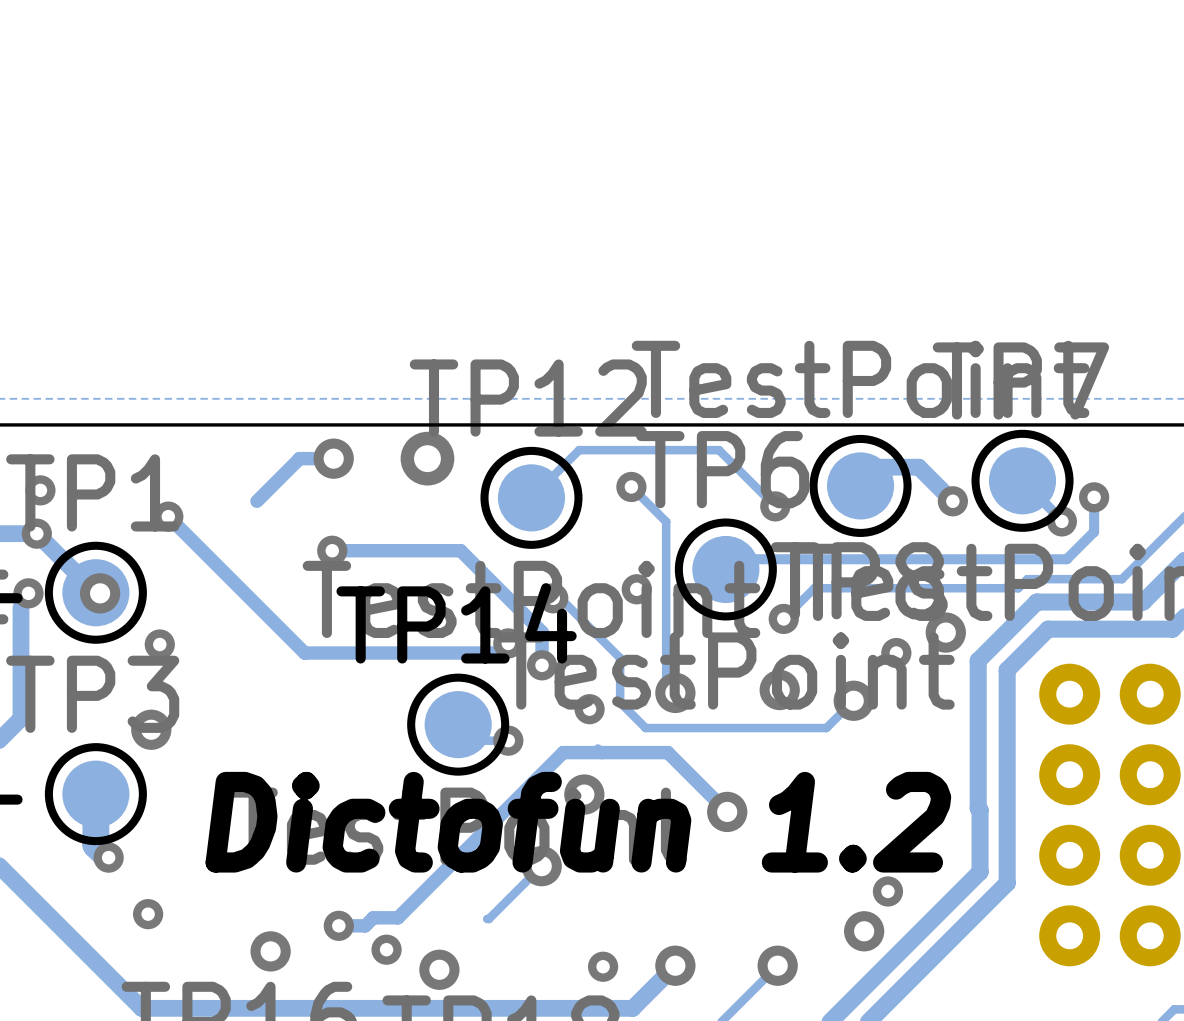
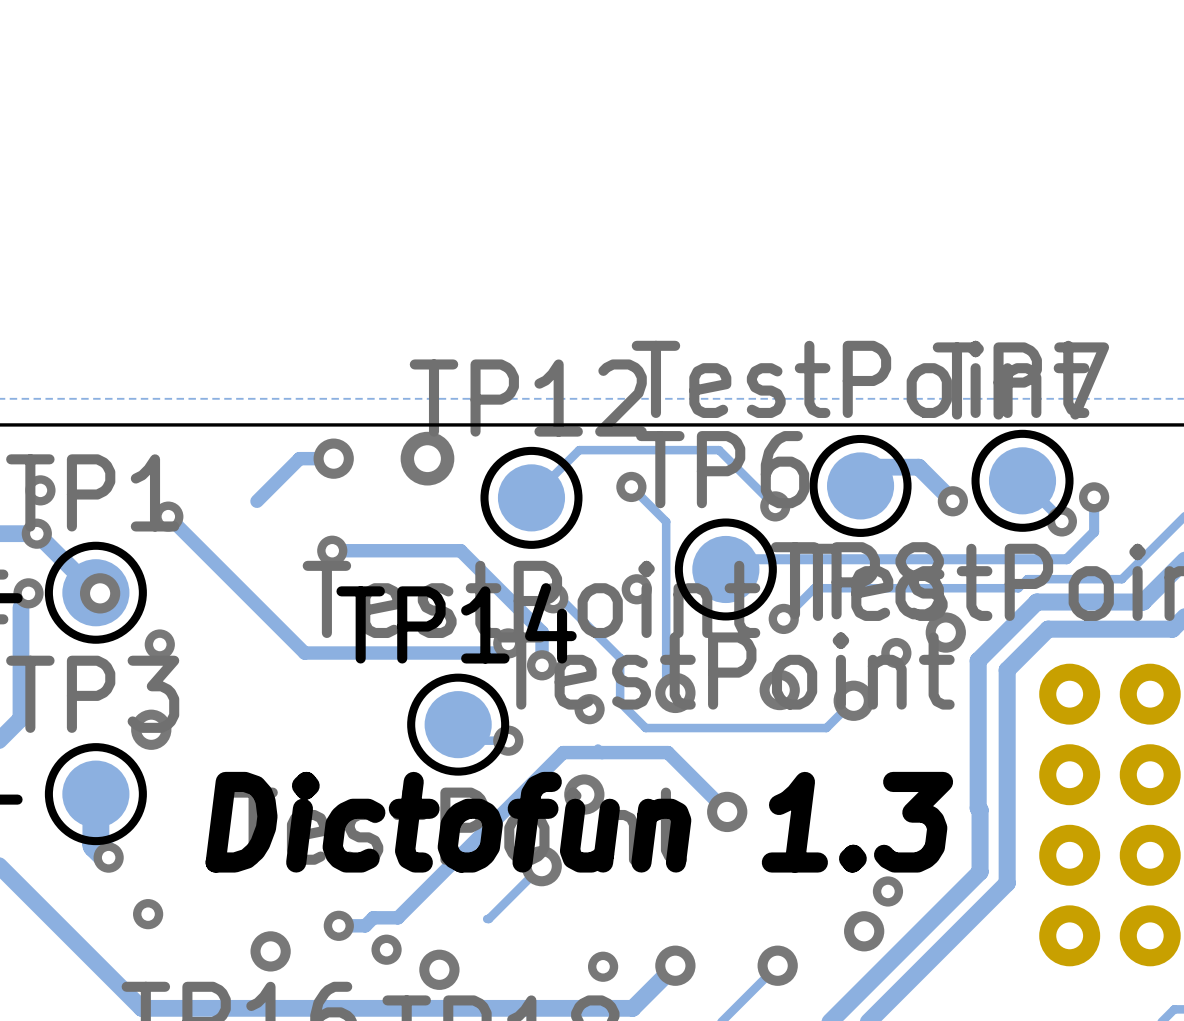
text: Dictofun 1.2 (578, 822) -> Dictofun 1.3 (579, 822)

